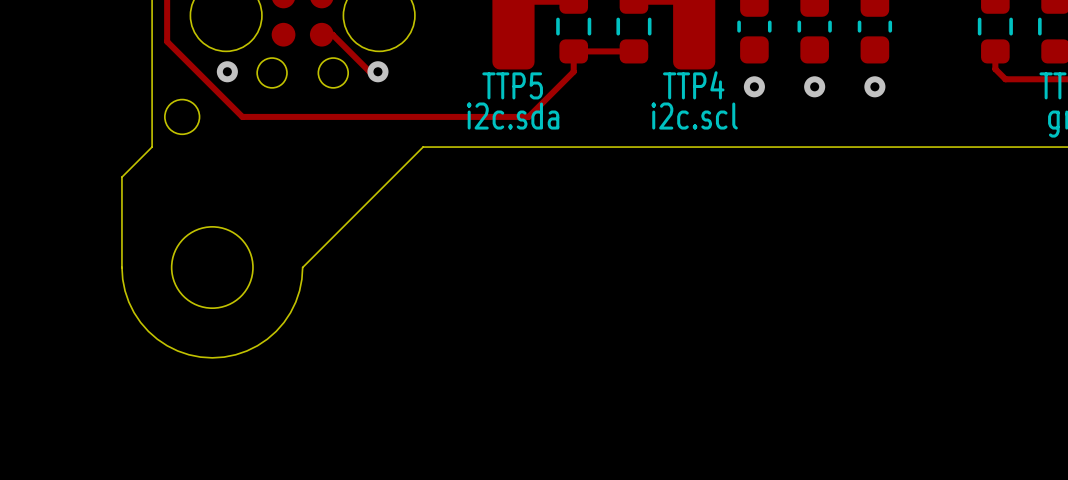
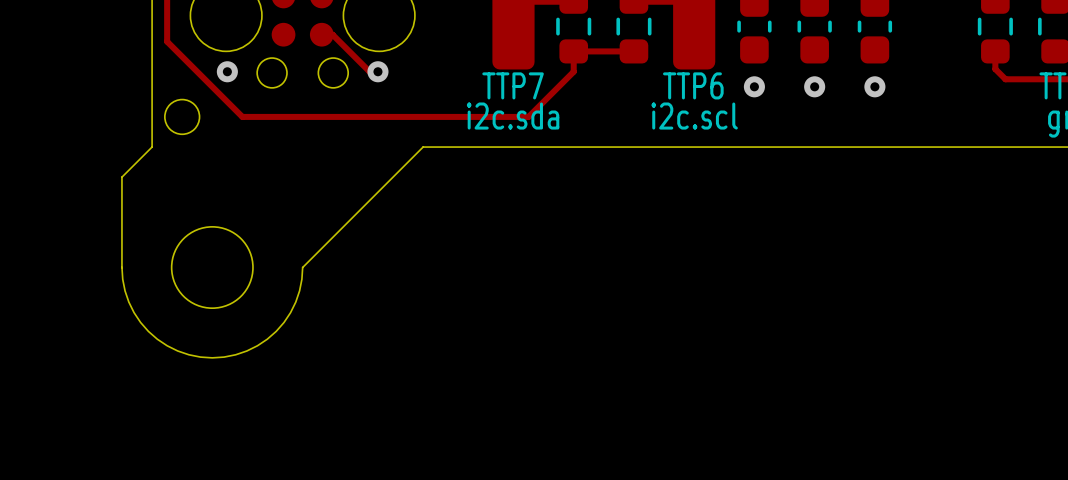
TTP5 name: TTP5 (512, 85) -> TTP7 (513, 85)
TTP4 name: TTP4 (693, 85) -> TTP6 (693, 85)

